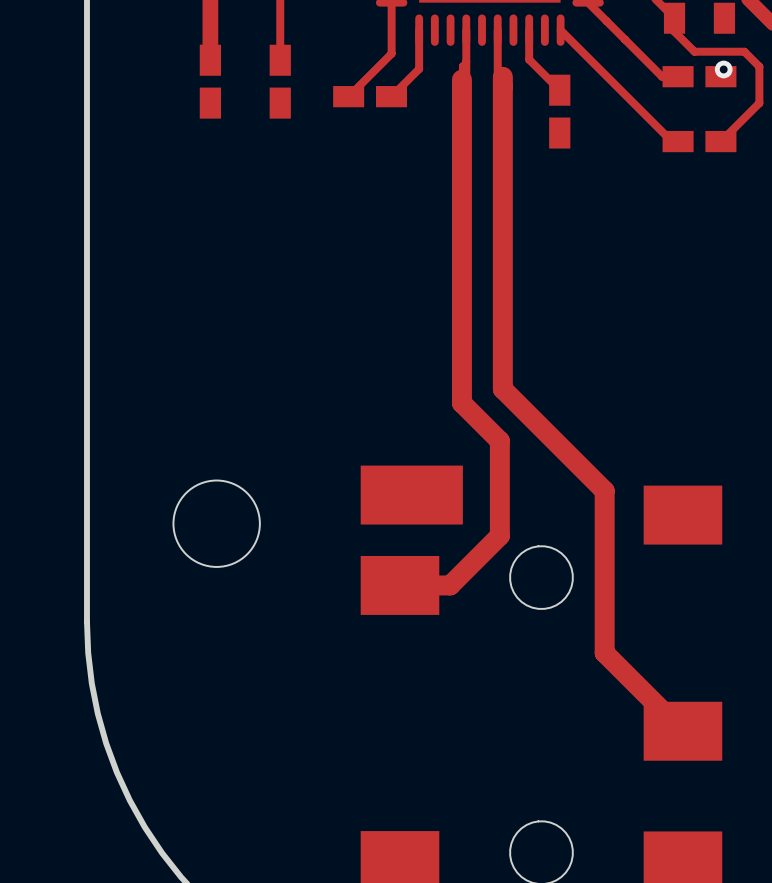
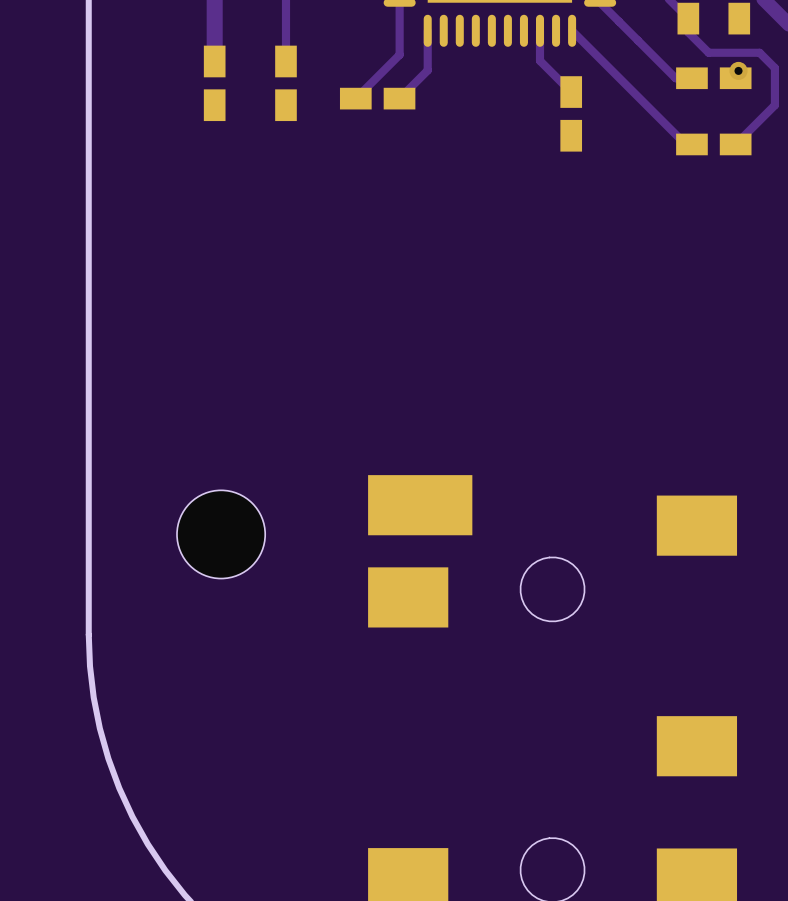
track: (466, 30) (466, 75) -> none
track: (497, 30) (497, 81) (502, 86) -> none
track: (466, 61) (461, 65) (461, 403) (499, 441) (499, 535) (450, 585) (400, 585) -> none
track: (502, 76) (502, 389) (604, 490) (604, 652) (682, 731) -> none

